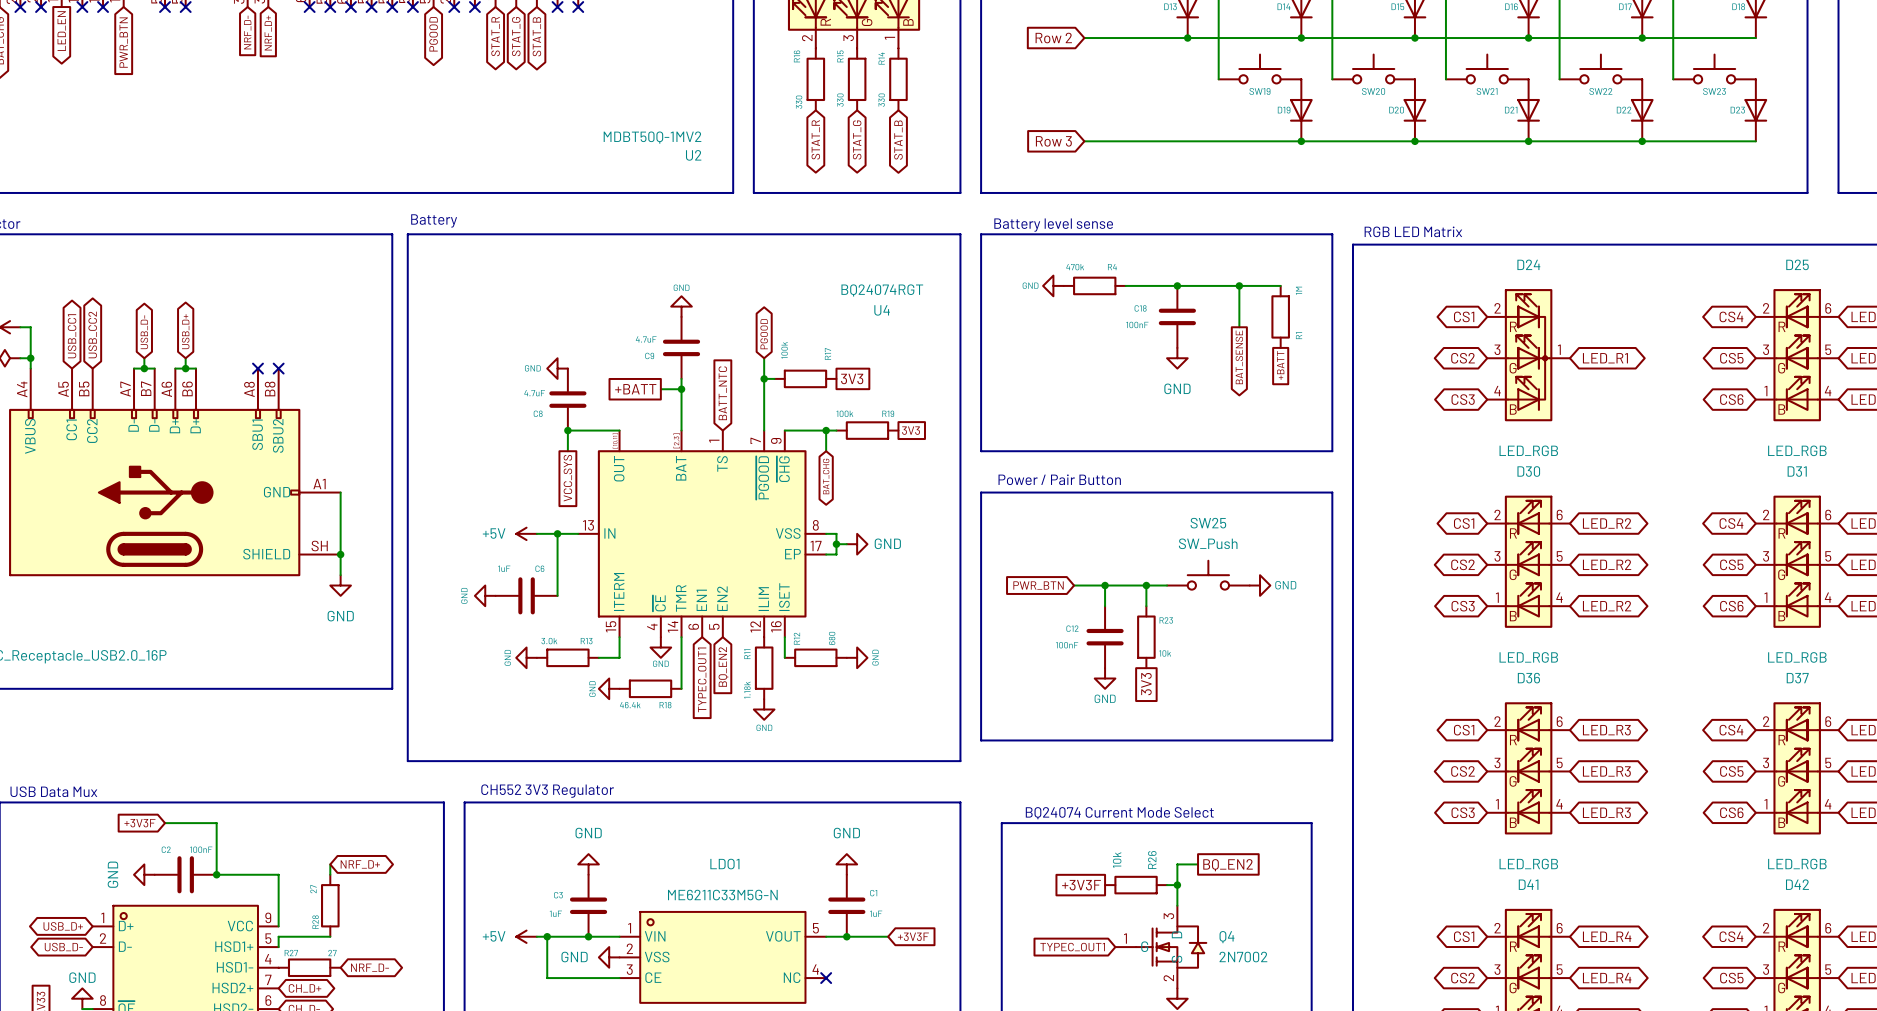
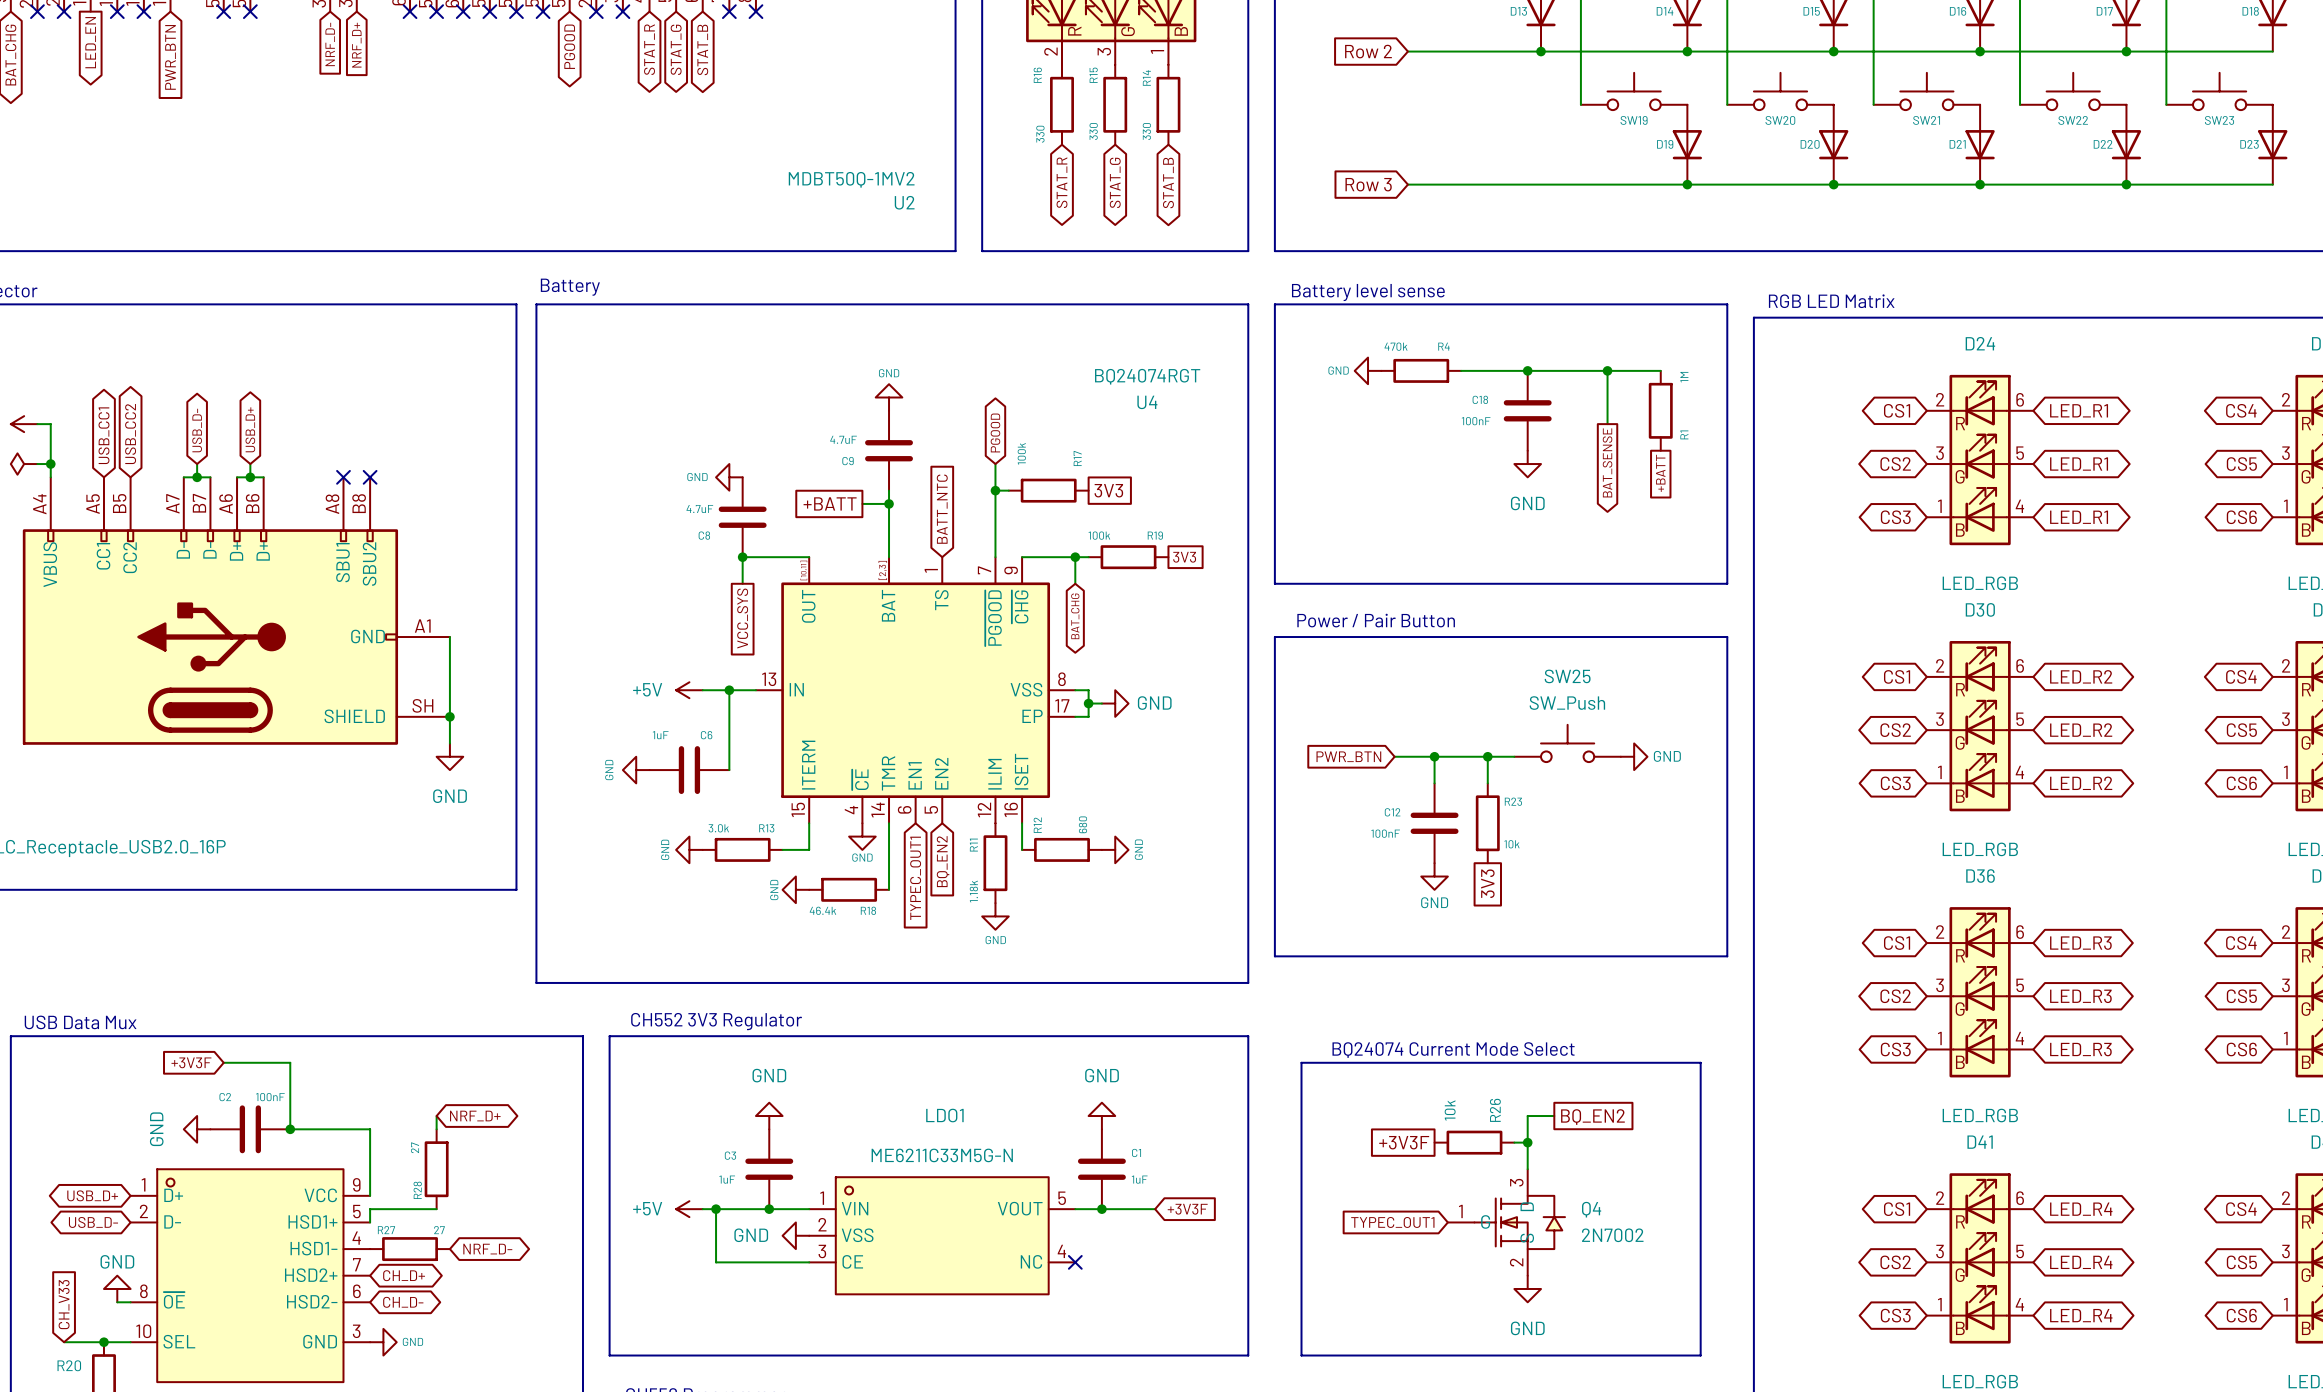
D24 symbol: [1487, 289, 1570, 422] -> [1926, 374, 2034, 546]
global label: none -> LED_R1 (2079, 410)
global label: none -> LED_R1 (2079, 517)

